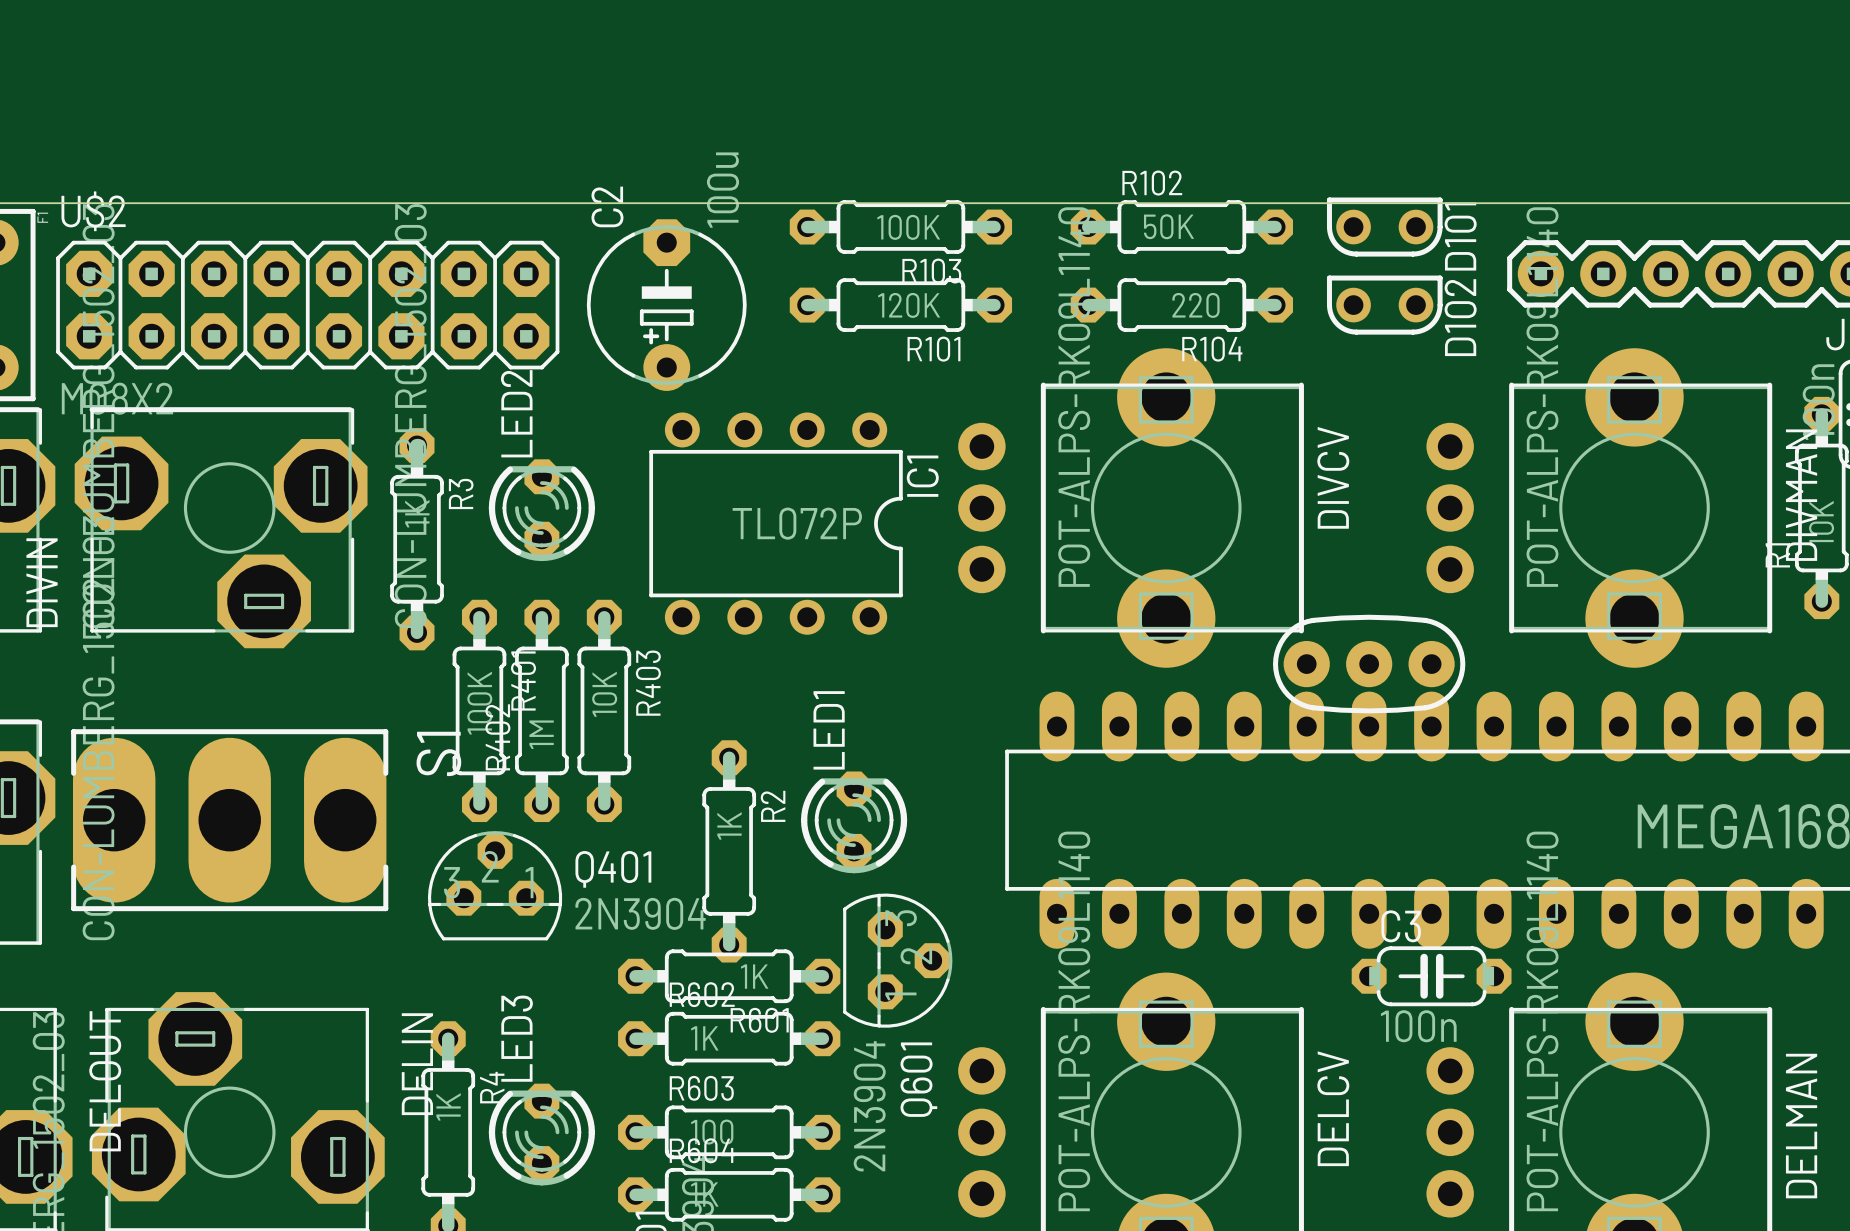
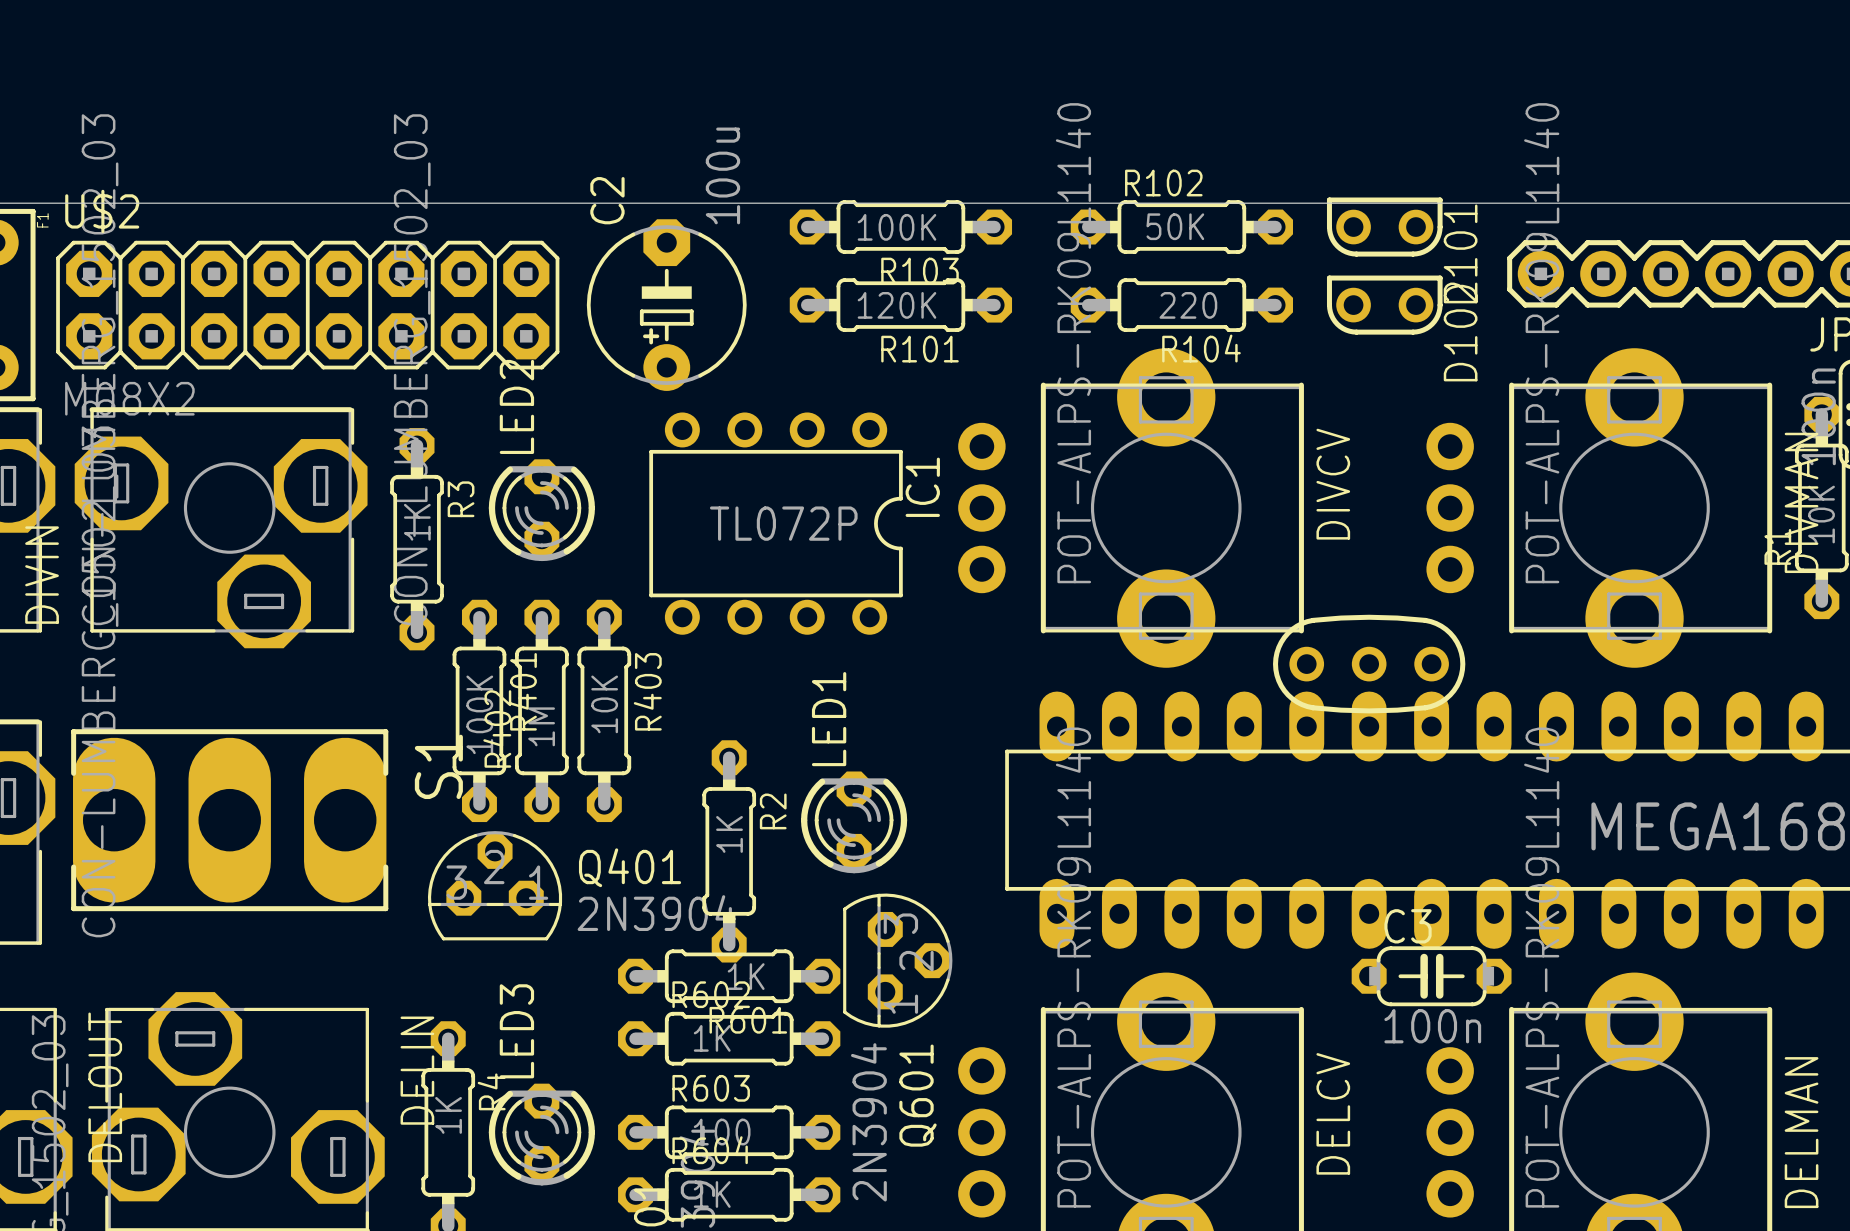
part footprint: [1273, 614, 1466, 714] -> [1273, 614, 1466, 714]

